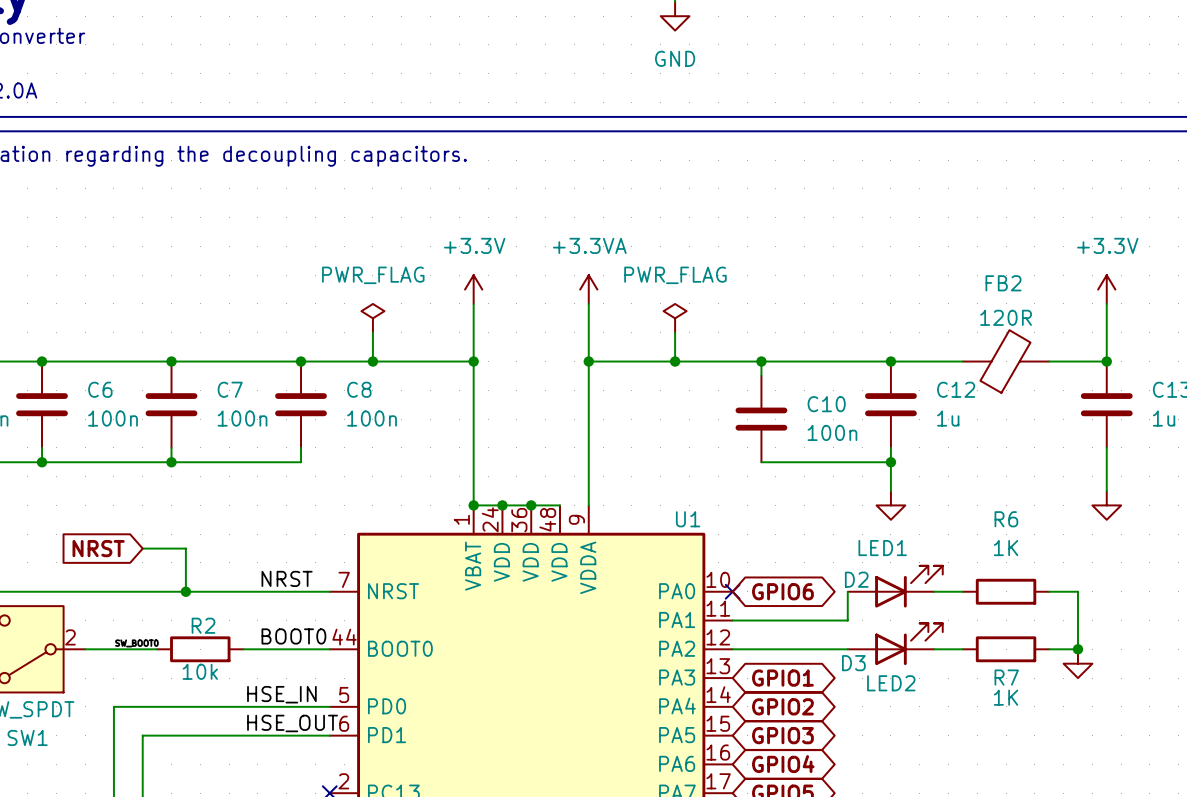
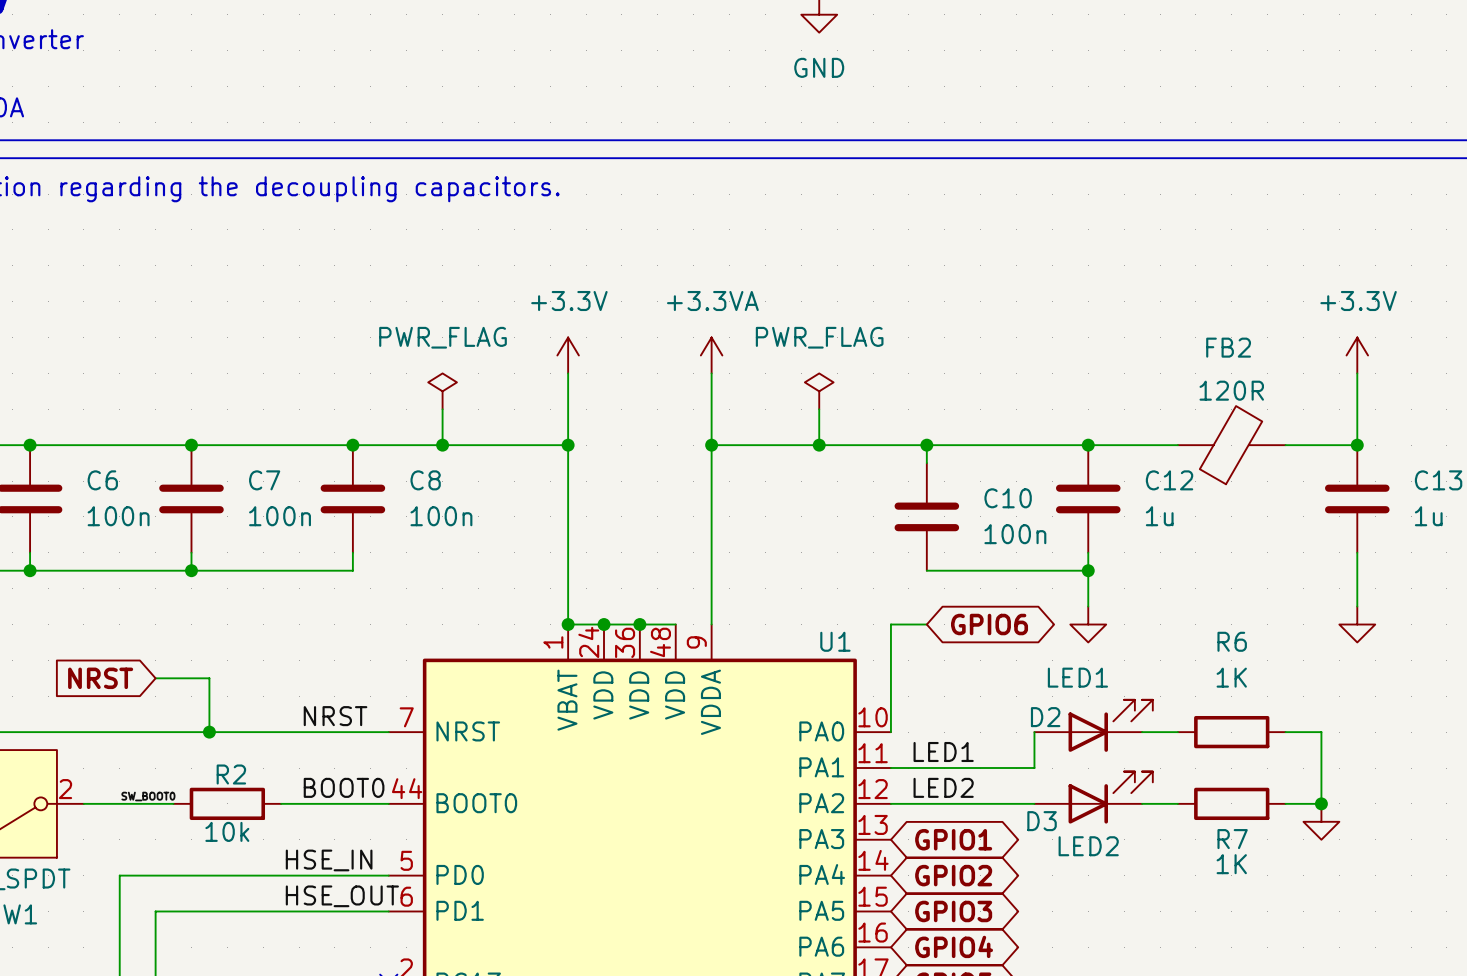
wire: none -> (926, 624) (890, 624) (890, 732)
no-connect mark: (732, 591) -> none
global label position: GPIO6 (782, 591) -> GPIO6 (989, 624)
label: none -> LED1 (943, 751)
label: none -> LED2 (943, 787)

